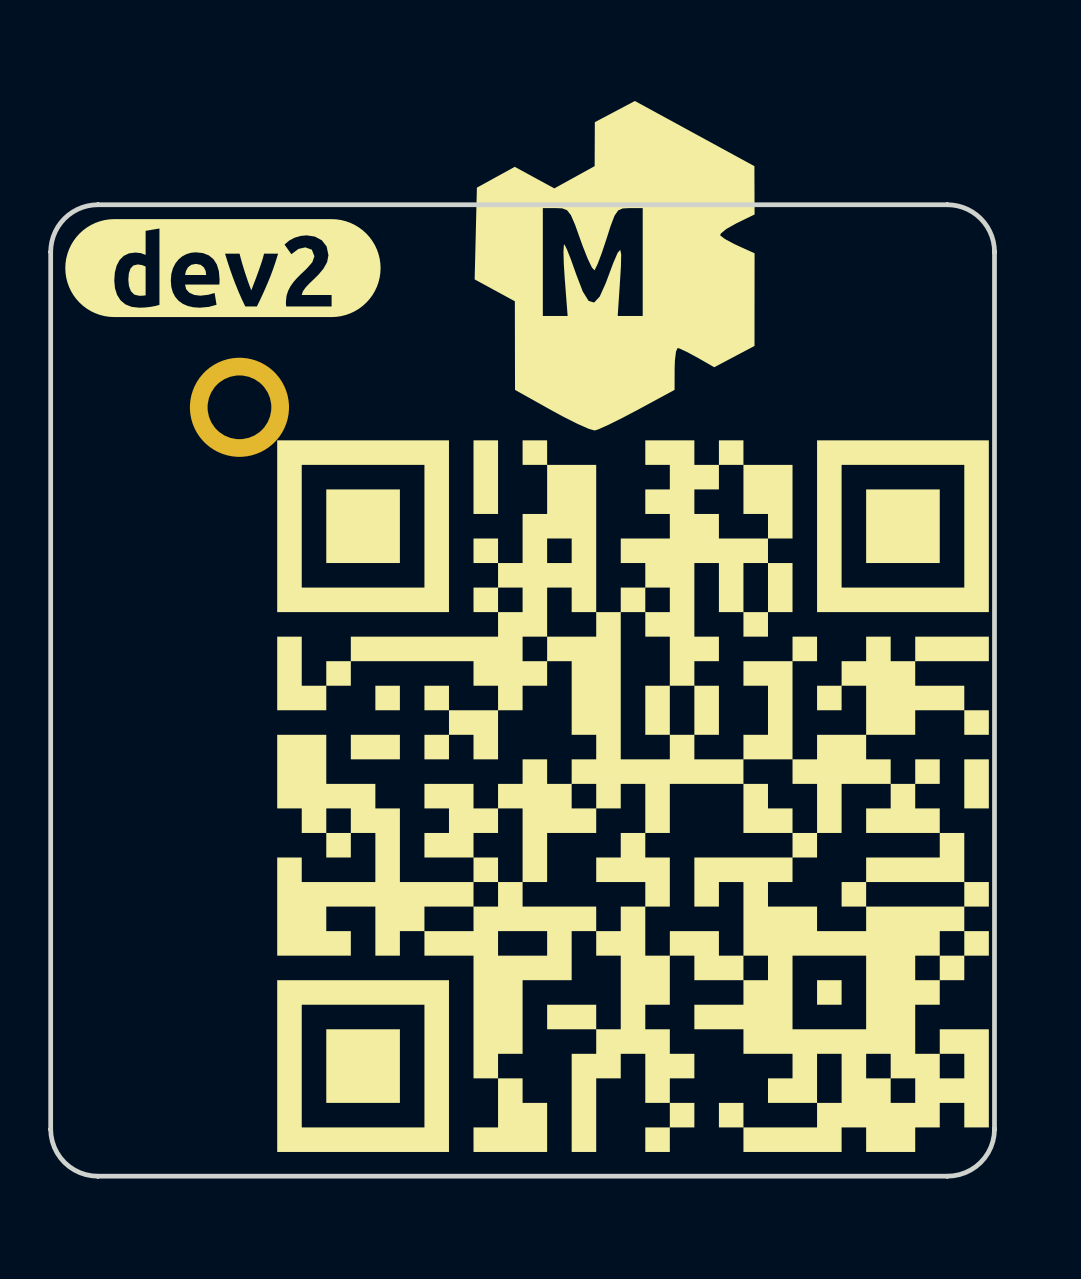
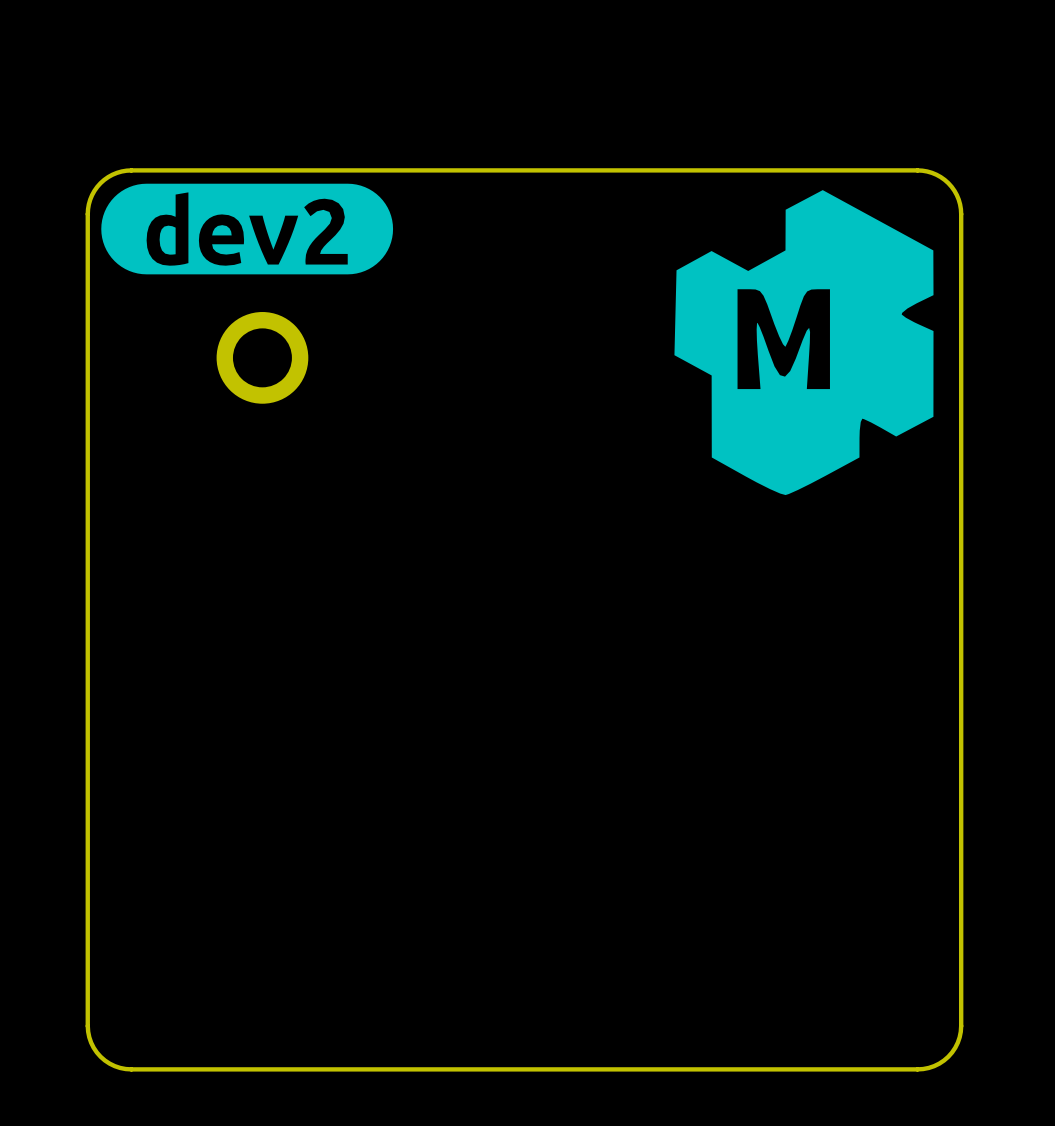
drawing position: (614, 265) -> (803, 342)
drawing: [277, 440, 989, 1152] -> none

